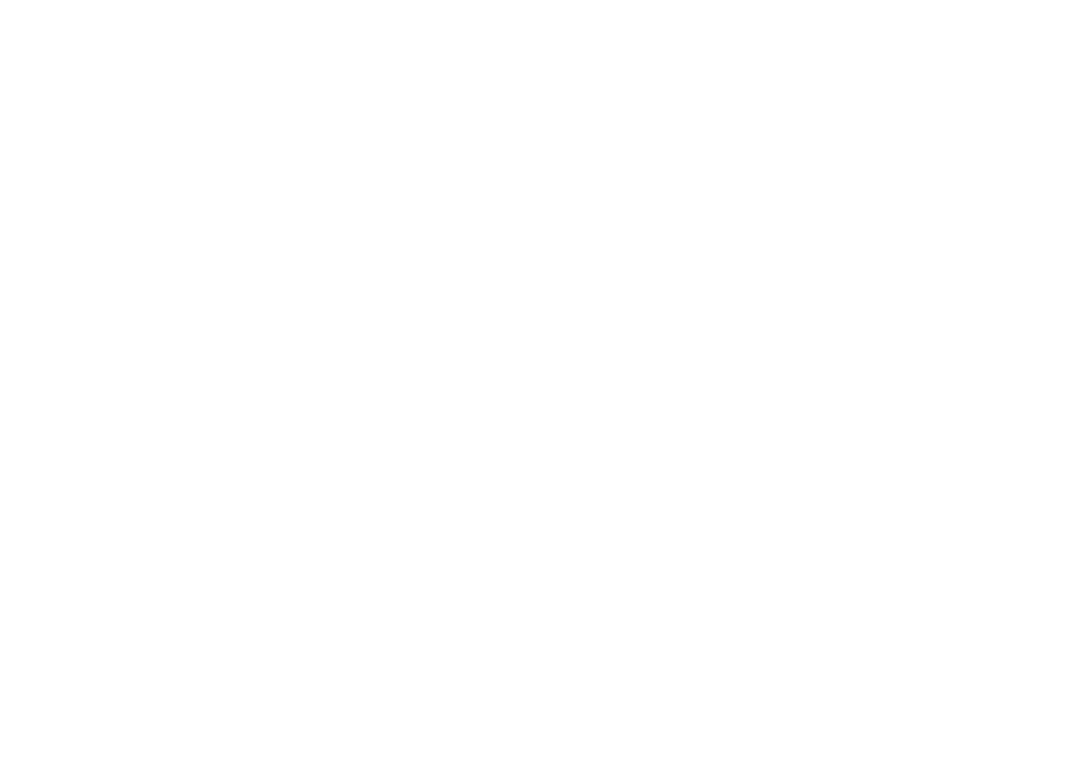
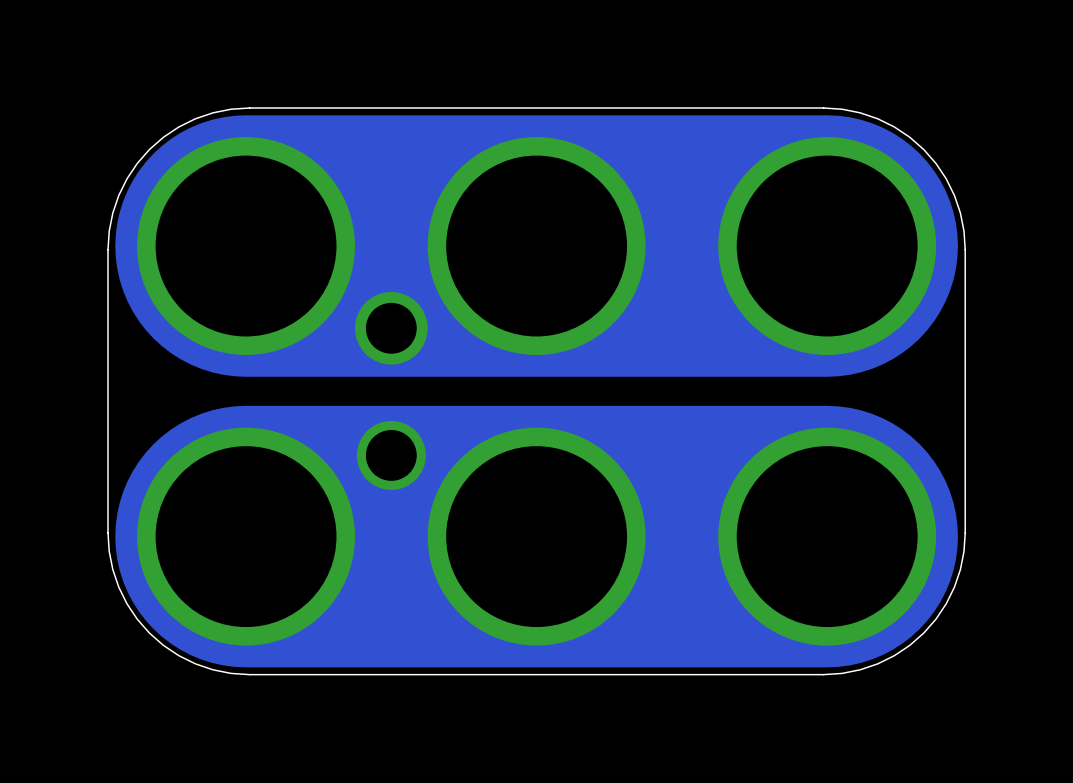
part: none -> (536, 391)

